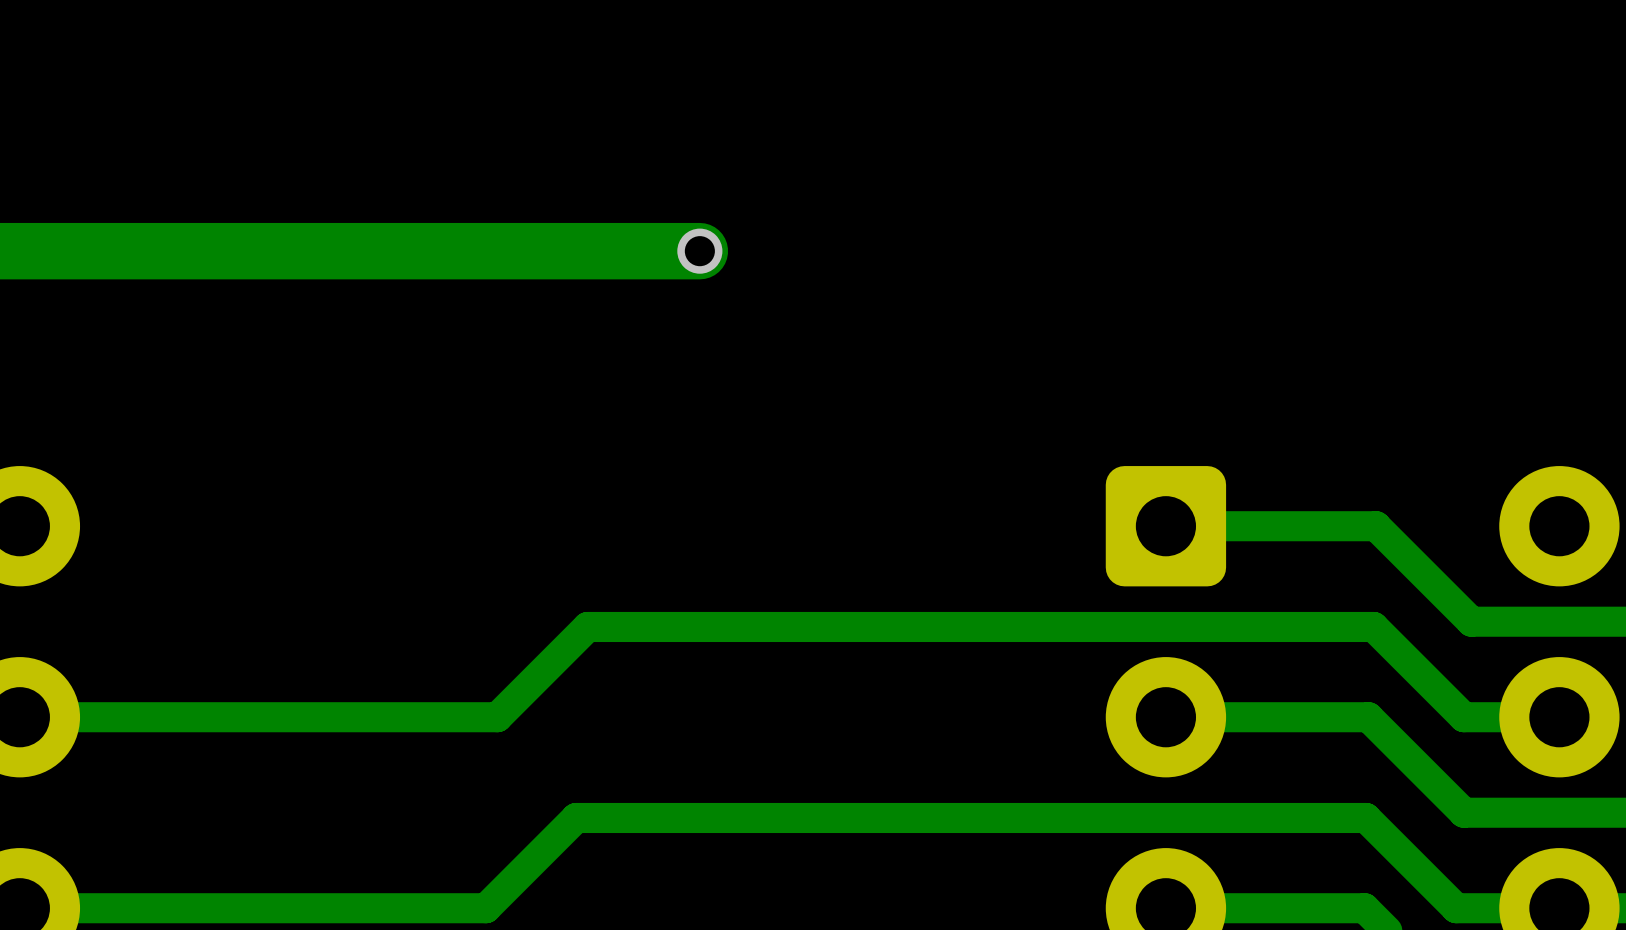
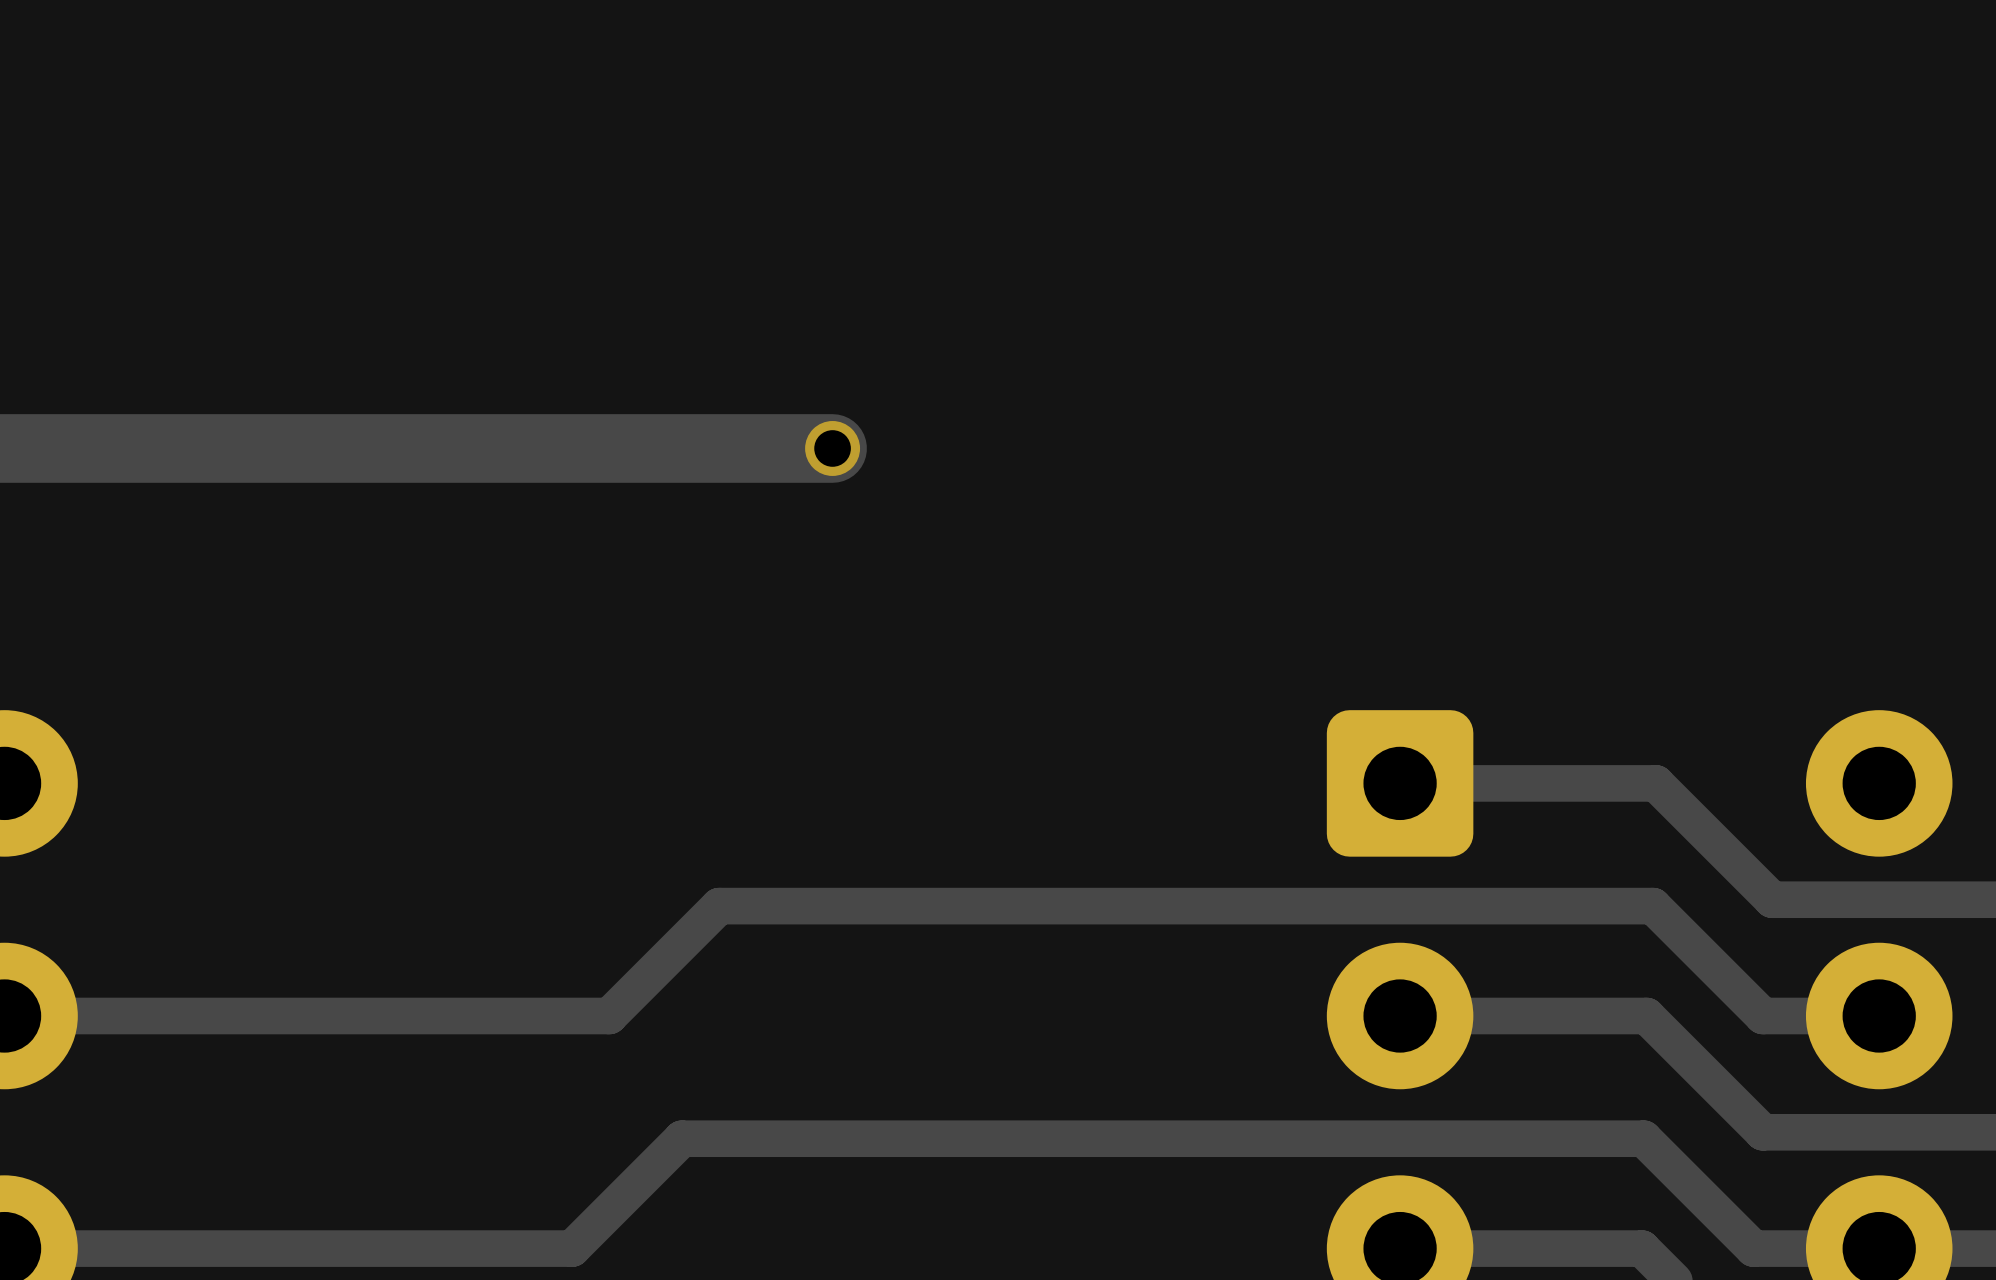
track: (606, 626) (587, 626) (497, 717) -> (719, 906) (609, 1016) (586, 1016)

